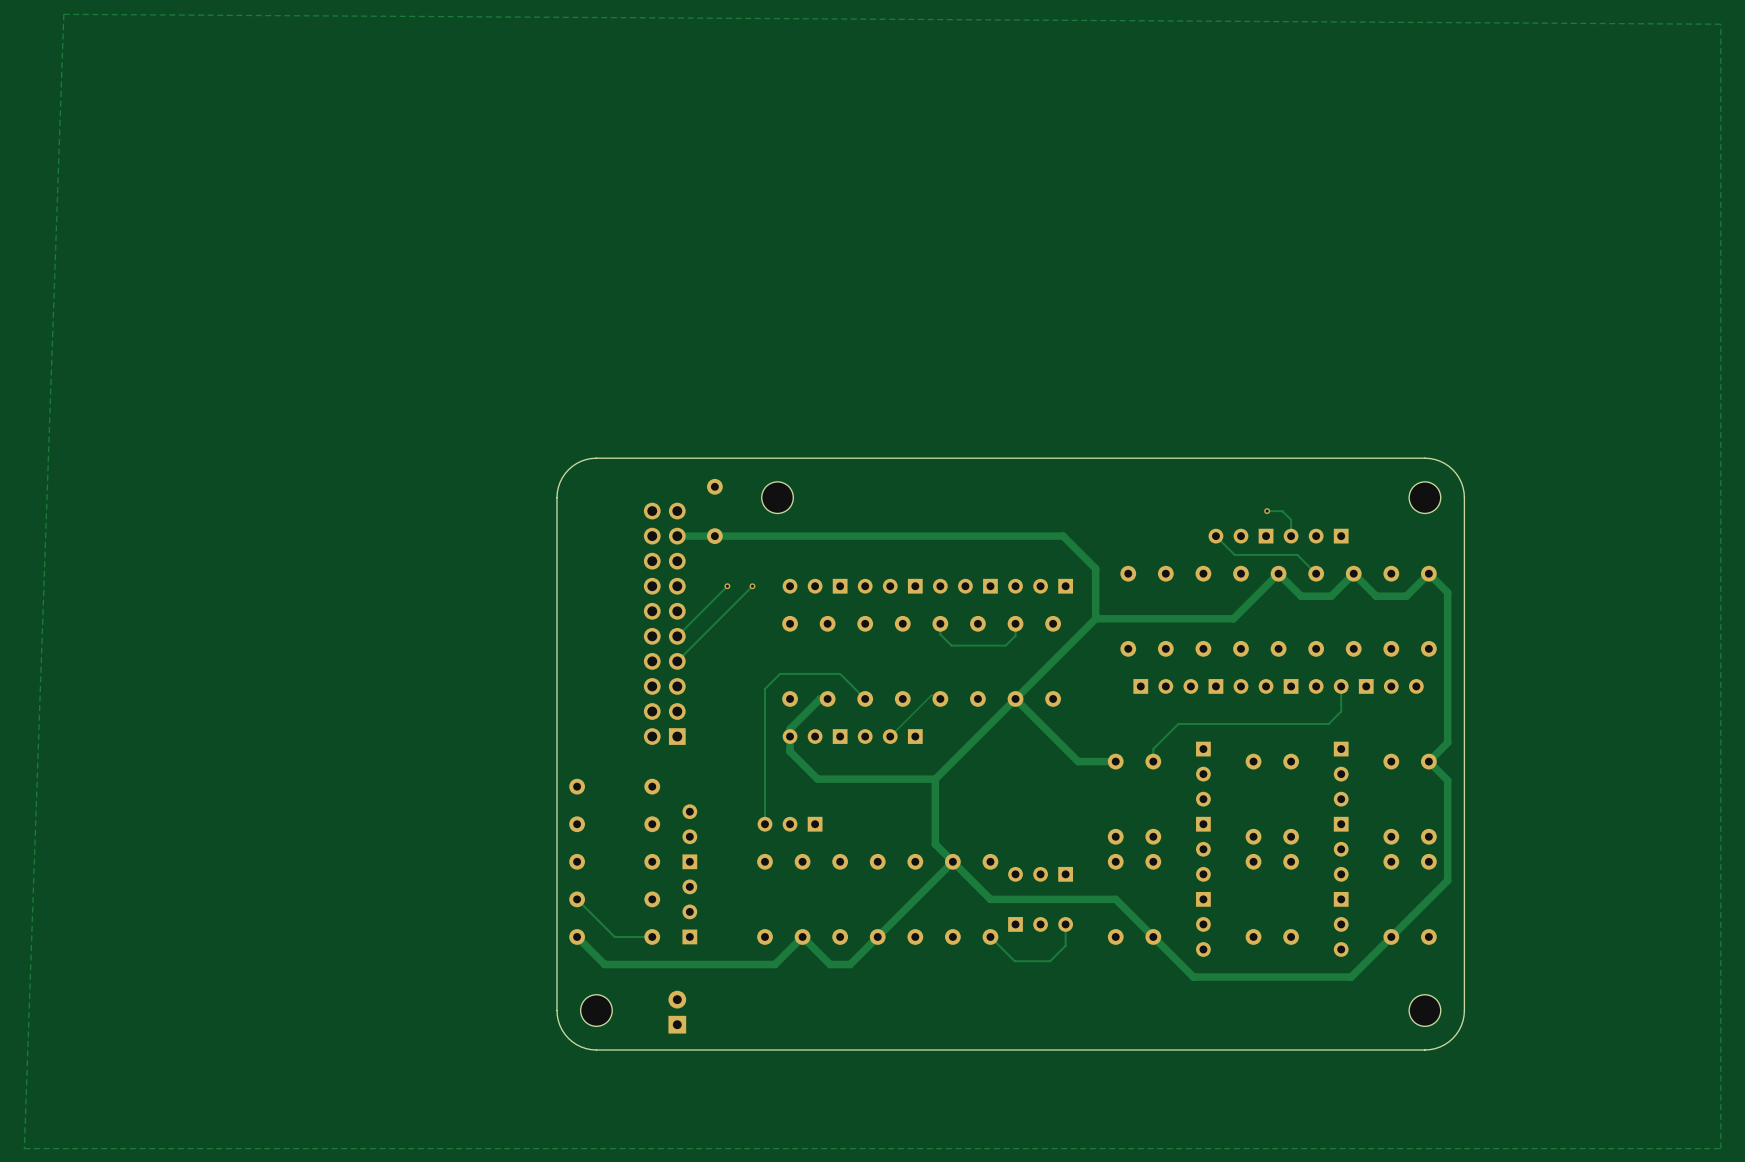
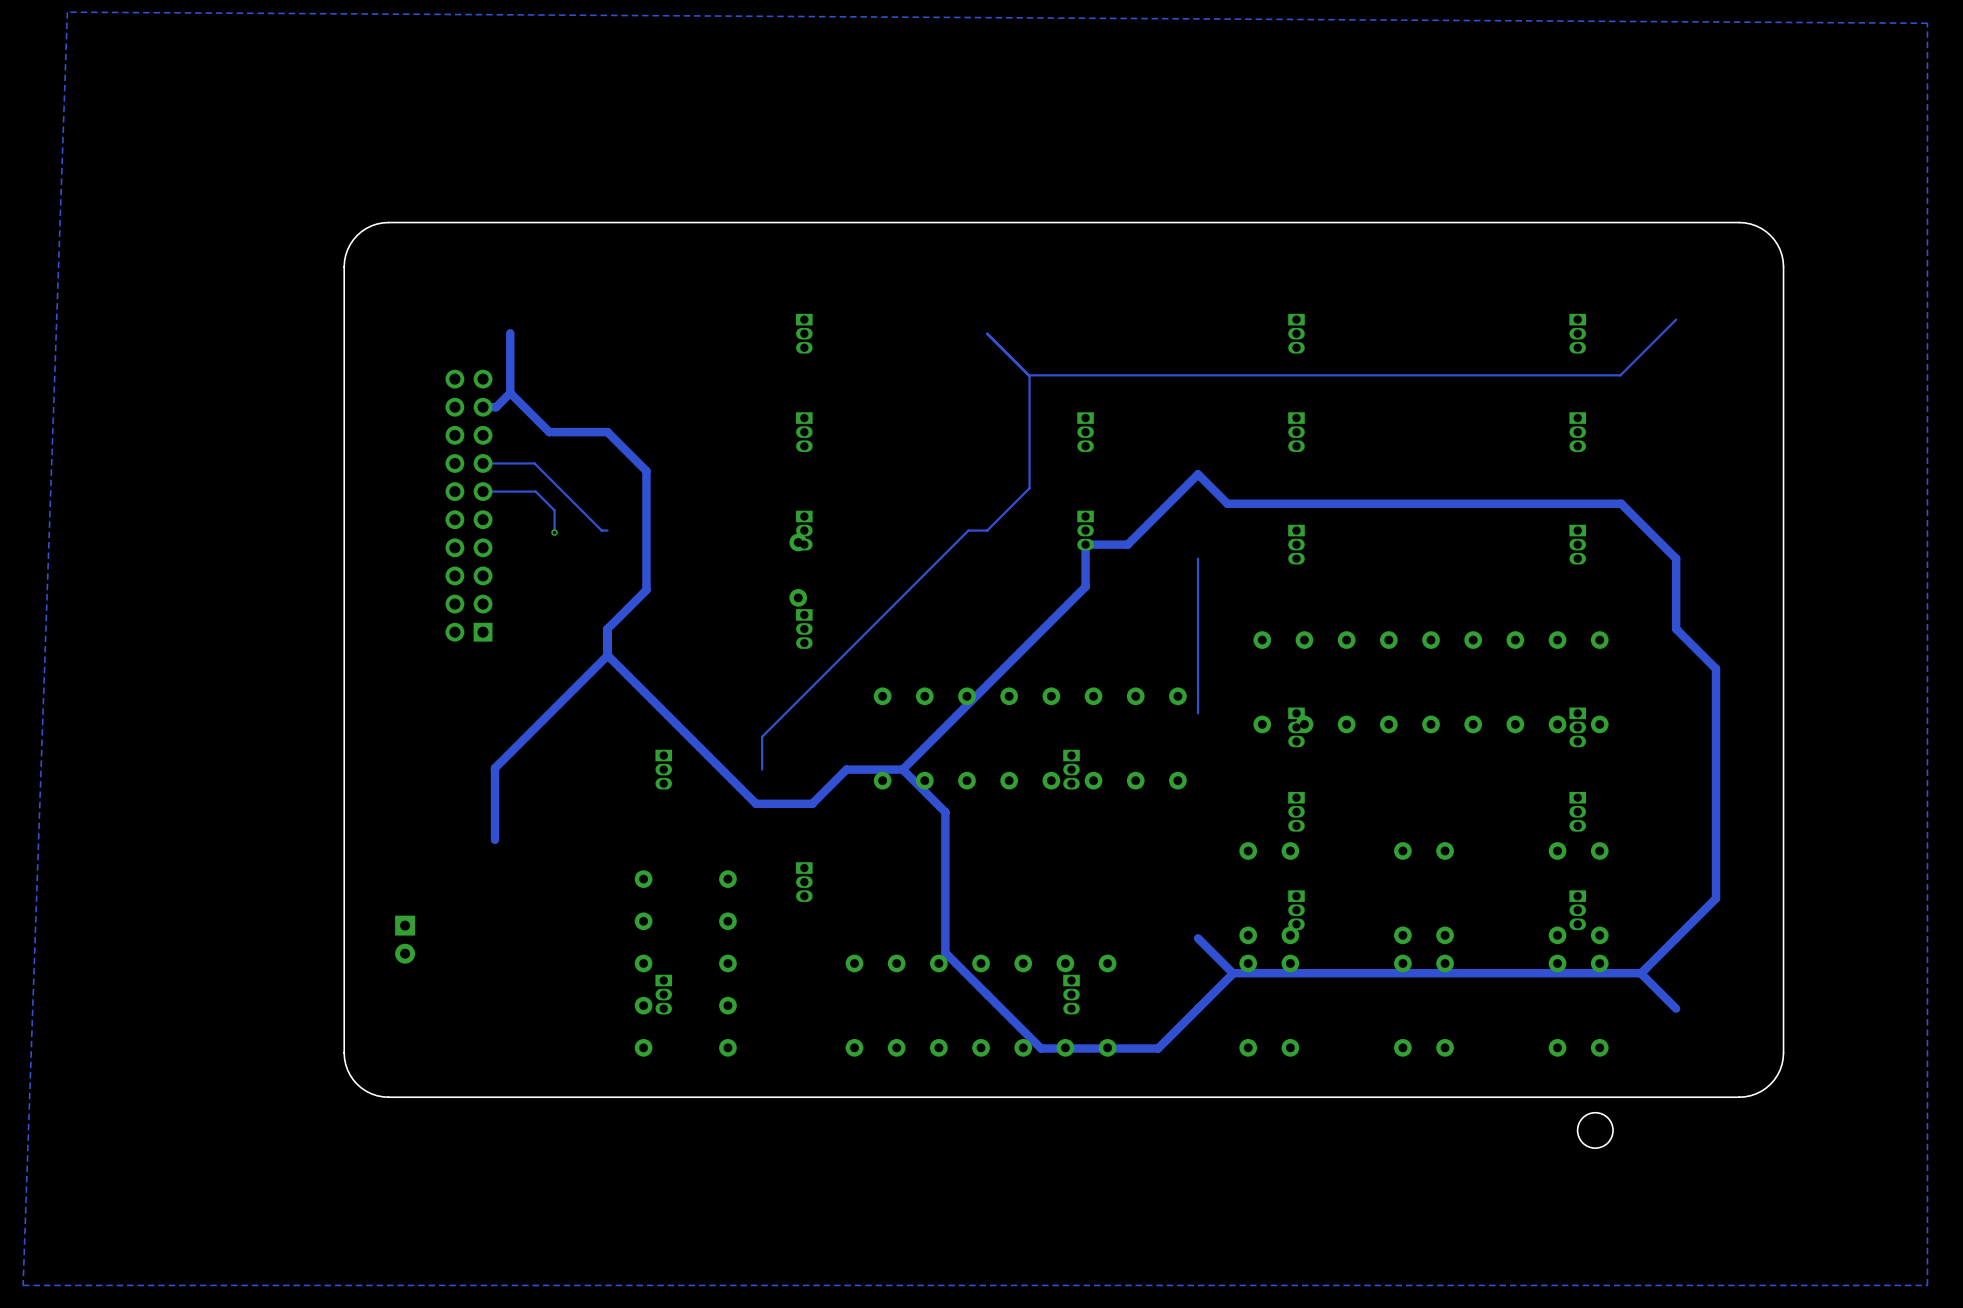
board edge: none -> (1739, 222) (388, 222) (377, 224) (366, 228) (357, 235) (350, 244) (345, 255) (344, 266) (344, 1052) (345, 1064) (350, 1075) (357, 1084) (366, 1091) (377, 1095) (388, 1097) (1739, 1097) (1750, 1095) (1761, 1091) (1770, 1084) (1777, 1075) (1782, 1064) (1783, 1052) (1783, 266) (1780, 249) (1770, 235) (1756, 225) (1739, 222)
track: none -> (1676, 319) (1620, 375) (1028, 375)
track: none -> (510, 333) (510, 393)
part: none -> (804, 333)
track: none -> (987, 333) (1029, 376) (1029, 488) (987, 530) (968, 530) (762, 736) (762, 769)
part: none -> (1296, 333)
part: none -> (1577, 333)
track: none -> (510, 393) (496, 407) (483, 407)
track: none -> (510, 393) (549, 432) (607, 432) (646, 471) (646, 590) (607, 628) (607, 655) (494, 768) (494, 839)
part: none -> (804, 432)
part: none -> (1085, 432)
part: none -> (1296, 432)
part: none -> (1577, 432)
track: none -> (483, 463) (534, 463) (601, 530) (607, 530)
track: none -> (483, 491) (535, 491) (554, 510) (554, 532)
part: none -> (468, 505)
board edge: (1424, 458) (596, 458) (576, 463) (562, 477) (556, 497) (556, 1010) (562, 1030) (576, 1044) (596, 1049) (1424, 1049) (1444, 1044) (1459, 1030) (1464, 1010) (1464, 497) (1461, 482) (1452, 469) (1440, 461) (1424, 458) -> none
part: none -> (804, 530)
part: none -> (1085, 530)
via: none -> (554, 532)
part: none -> (1296, 544)
part: none -> (1577, 544)
part: (777, 497) -> none
part: (1424, 497) -> none
track: none -> (1198, 558) (1198, 713)
track: (1267, 511) (1282, 511) (1291, 519) (1291, 536) -> none
via: (1267, 511) -> none
track: (677, 536) (1063, 536) (1095, 568) (1095, 618) -> none
track: (1215, 536) (1234, 554) (1297, 554) (1316, 573) -> none
part: (1240, 536) -> none
part: (1316, 536) -> none
part: none -> (804, 628)
track: (727, 586) (677, 636) -> none
via: (727, 586) -> none
track: (752, 586) (677, 661) -> none
via: (752, 586) -> none
part: (815, 586) -> none
part: (890, 586) -> none
part: (965, 586) -> none
part: (1040, 586) -> none
track: none -> (607, 655) (756, 803) (812, 803) (846, 769) (902, 769)
track: (1095, 618) (935, 779) -> none
track: (1095, 618) (1233, 618) (1278, 573) (1301, 596) (1331, 596) (1353, 573) (1376, 596) (1406, 596) (1428, 573) (1447, 592) (1447, 742) (1428, 761) (1447, 780) (1447, 880) (1351, 977) (1193, 977) (1115, 899) (990, 899) (935, 844) (935, 779) -> none
part: (664, 623) -> none
track: (1015, 623) (1015, 635) (1005, 645) (951, 645) (940, 634) (940, 623) -> none
part: none -> (1296, 727)
part: none -> (1577, 727)
part: (1165, 686) -> none
part: (1240, 686) -> none
part: (1316, 686) -> none
track: (1341, 686) (1341, 711) (1328, 724) (1178, 724) (1153, 749) (1153, 761) -> none
part: (1391, 686) -> none
part: none -> (663, 769)
track: none -> (902, 769) (1085, 586) (1085, 544) (1127, 544) (1198, 474) (1227, 503) (1621, 503) (1676, 558) (1676, 628) (1716, 668) (1716, 898) (1640, 973) (1676, 1008)
track: none -> (902, 769) (945, 812) (945, 952) (1041, 1048) (1158, 1048) (1232, 973)
part: none -> (1071, 769)
track: (940, 695) (931, 695) (890, 736) -> none
track: (827, 698) (820, 698) (790, 729) (790, 751) (817, 779) (935, 779) -> none
track: (865, 698) (840, 673) (780, 673) (765, 688) (765, 824) -> none
track: (1015, 698) (1078, 761) (1115, 761) -> none
part: none -> (1296, 811)
part: none -> (1577, 811)
part: (815, 736) -> none
part: (890, 736) -> none
part: (1203, 774) -> none
part: (1341, 774) -> none
part: none -> (804, 882)
part: none -> (1296, 910)
part: none -> (1577, 910)
part: (790, 824) -> none
part: (689, 836) -> none
track: none -> (1198, 938) (1232, 973)
part: none -> (405, 939)
part: (1203, 849) -> none
part: (1341, 849) -> none
track: (952, 861) (850, 964) (830, 964) (802, 936) (775, 964) (604, 964) (577, 936) -> none
track: none -> (1641, 973) (1232, 973)
part: (1040, 874) -> none
part: none -> (663, 994)
part: none -> (1071, 994)
track: (577, 899) (614, 936) (652, 936) -> none
part: (689, 911) -> none
part: (1040, 924) -> none
track: (1065, 924) (1065, 945) (1050, 961) (1014, 961) (990, 936) -> none
part: (1203, 924) -> none
part: (1341, 924) -> none
part: (596, 1010) -> none
part: (677, 1012) -> none

